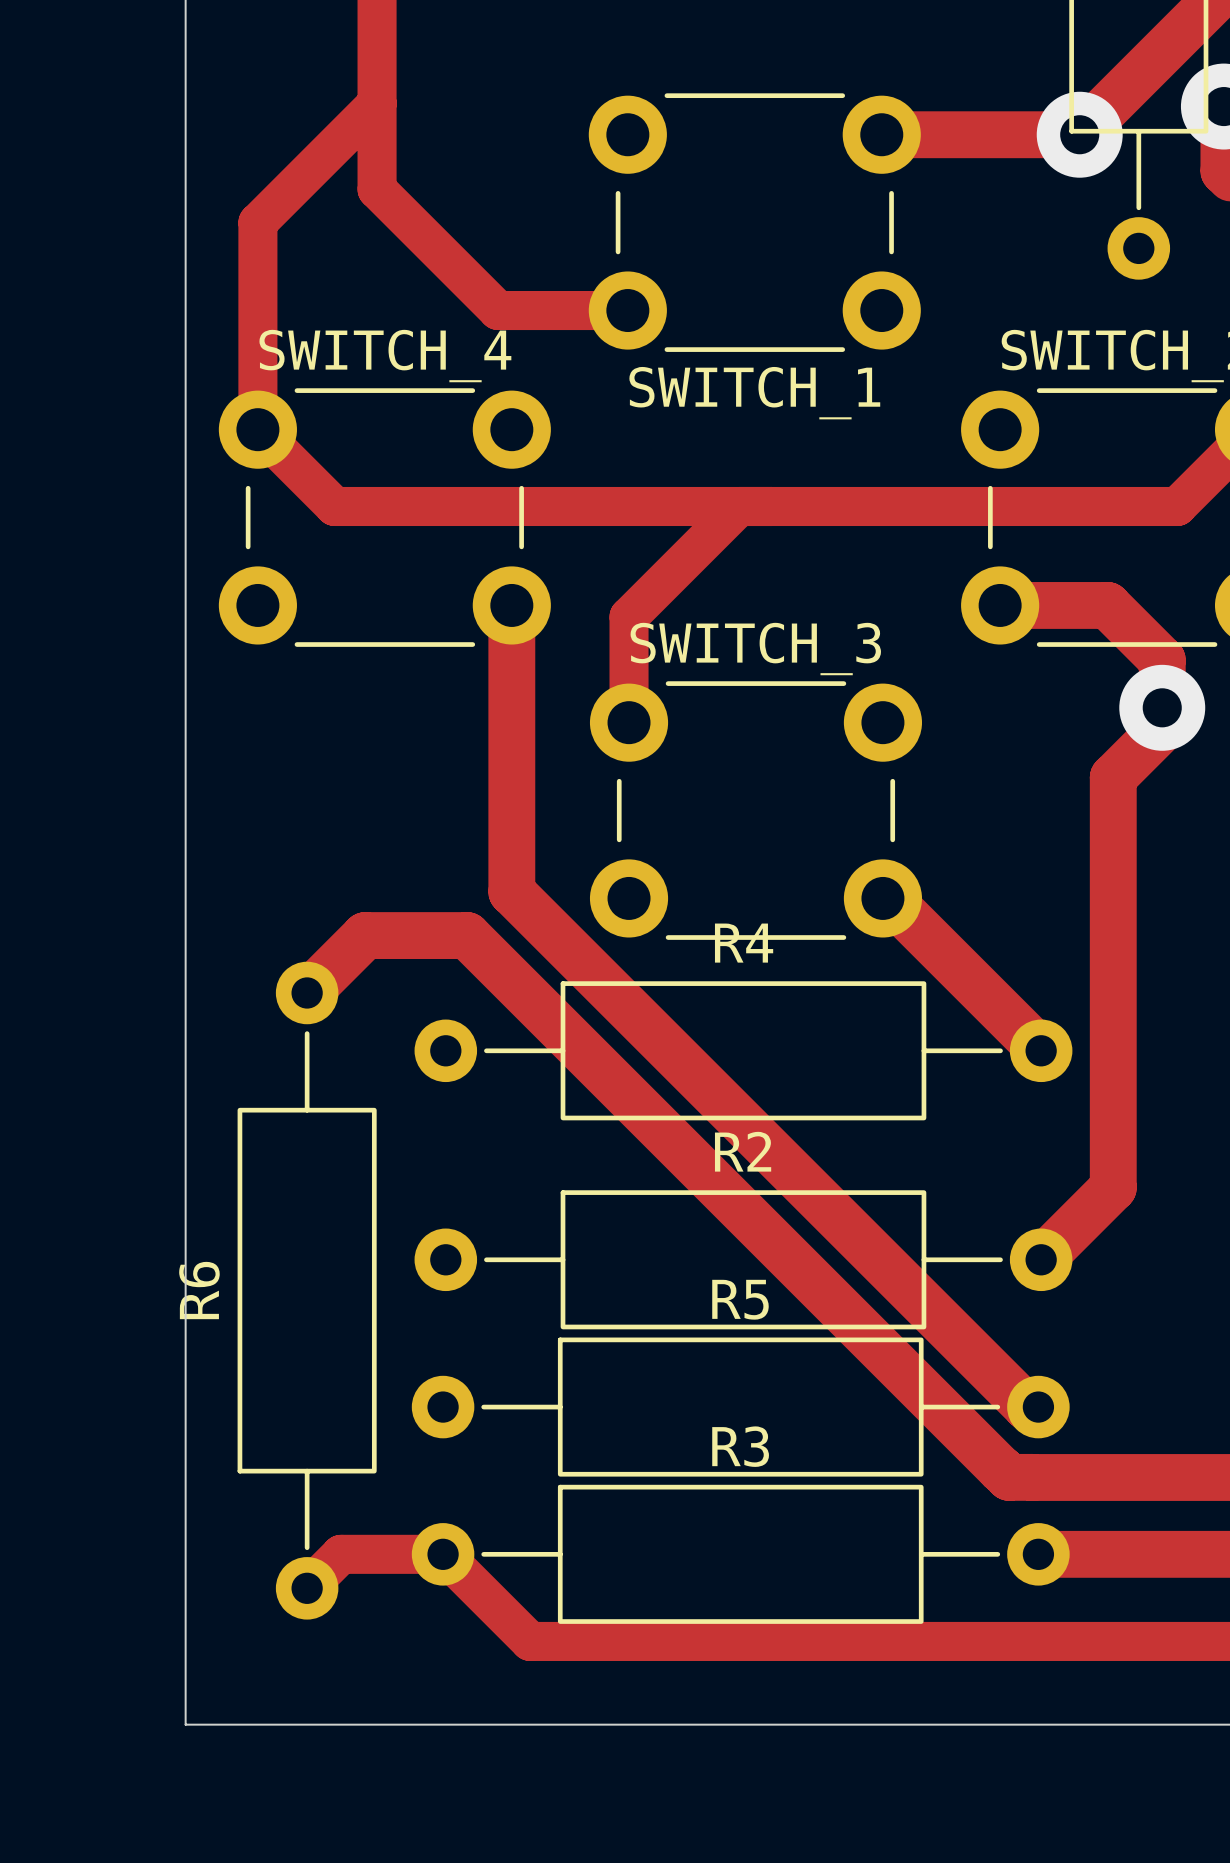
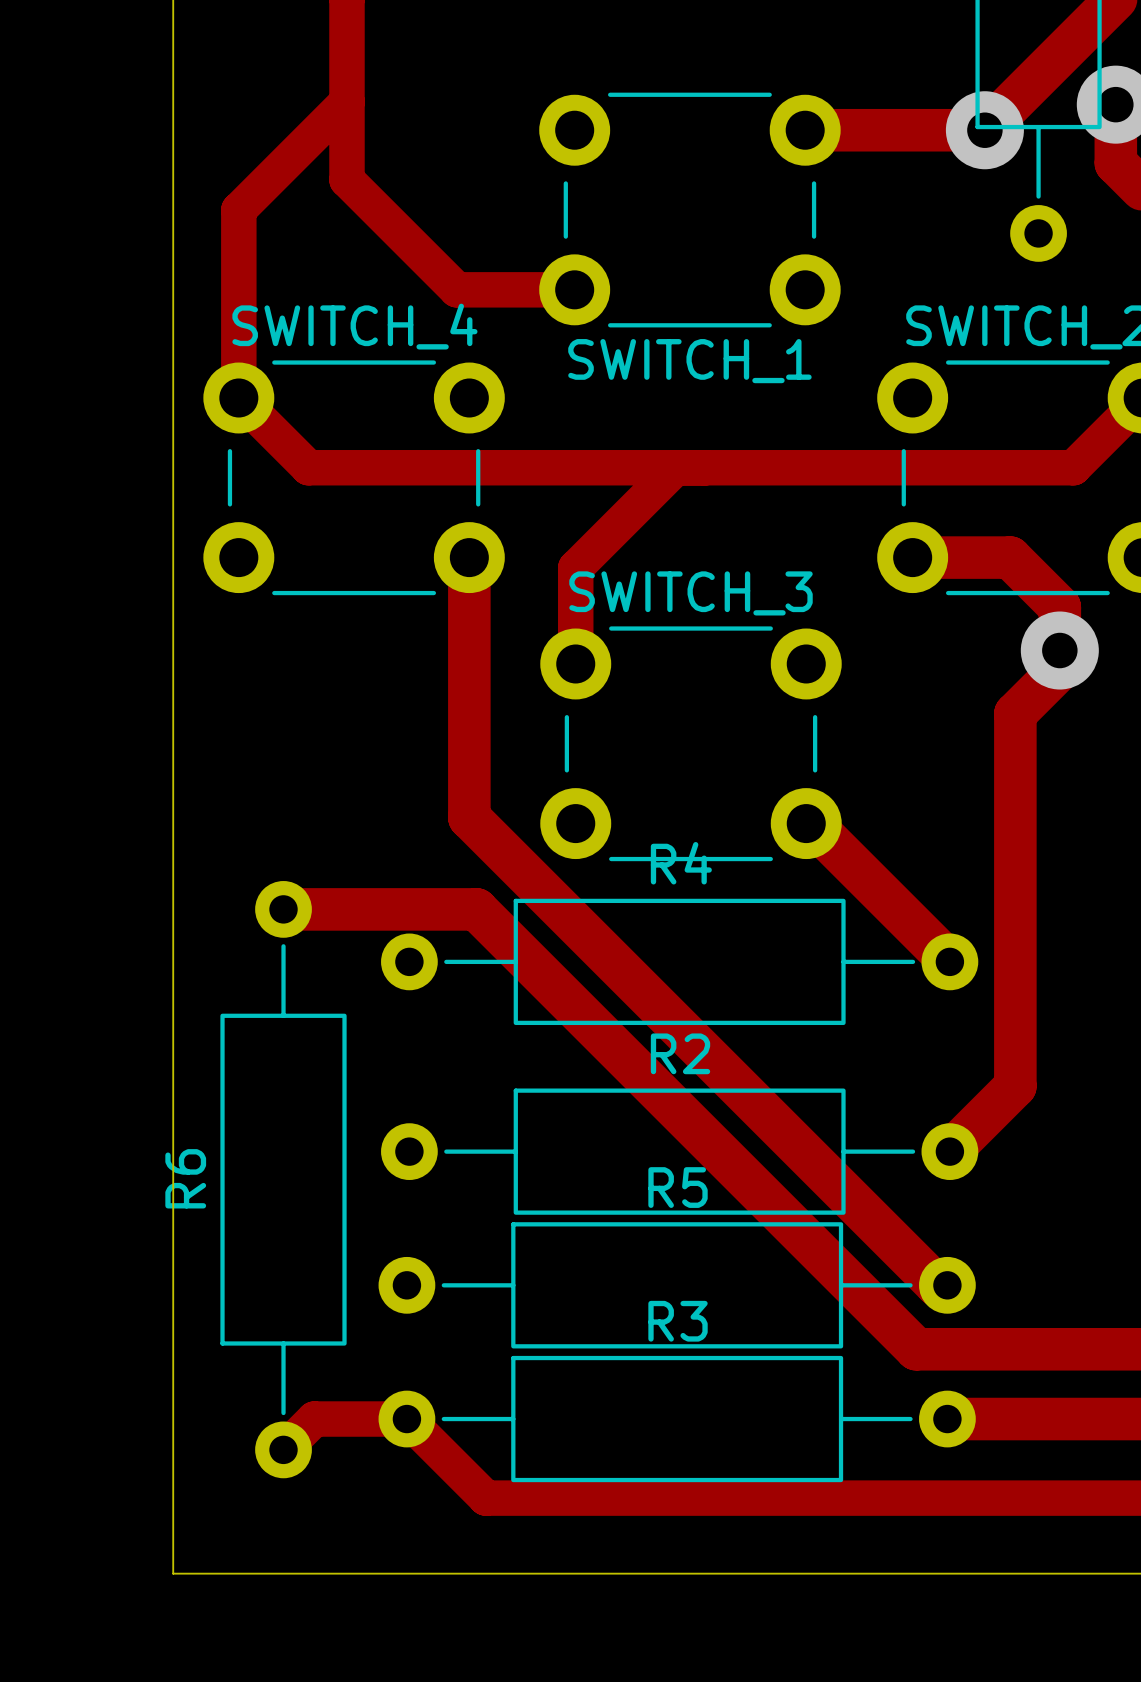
track: (307, 992) (365, 935) (467, 935) (1009, 1477) -> (284, 909) (476, 909) (916, 1349) (920, 1349)

